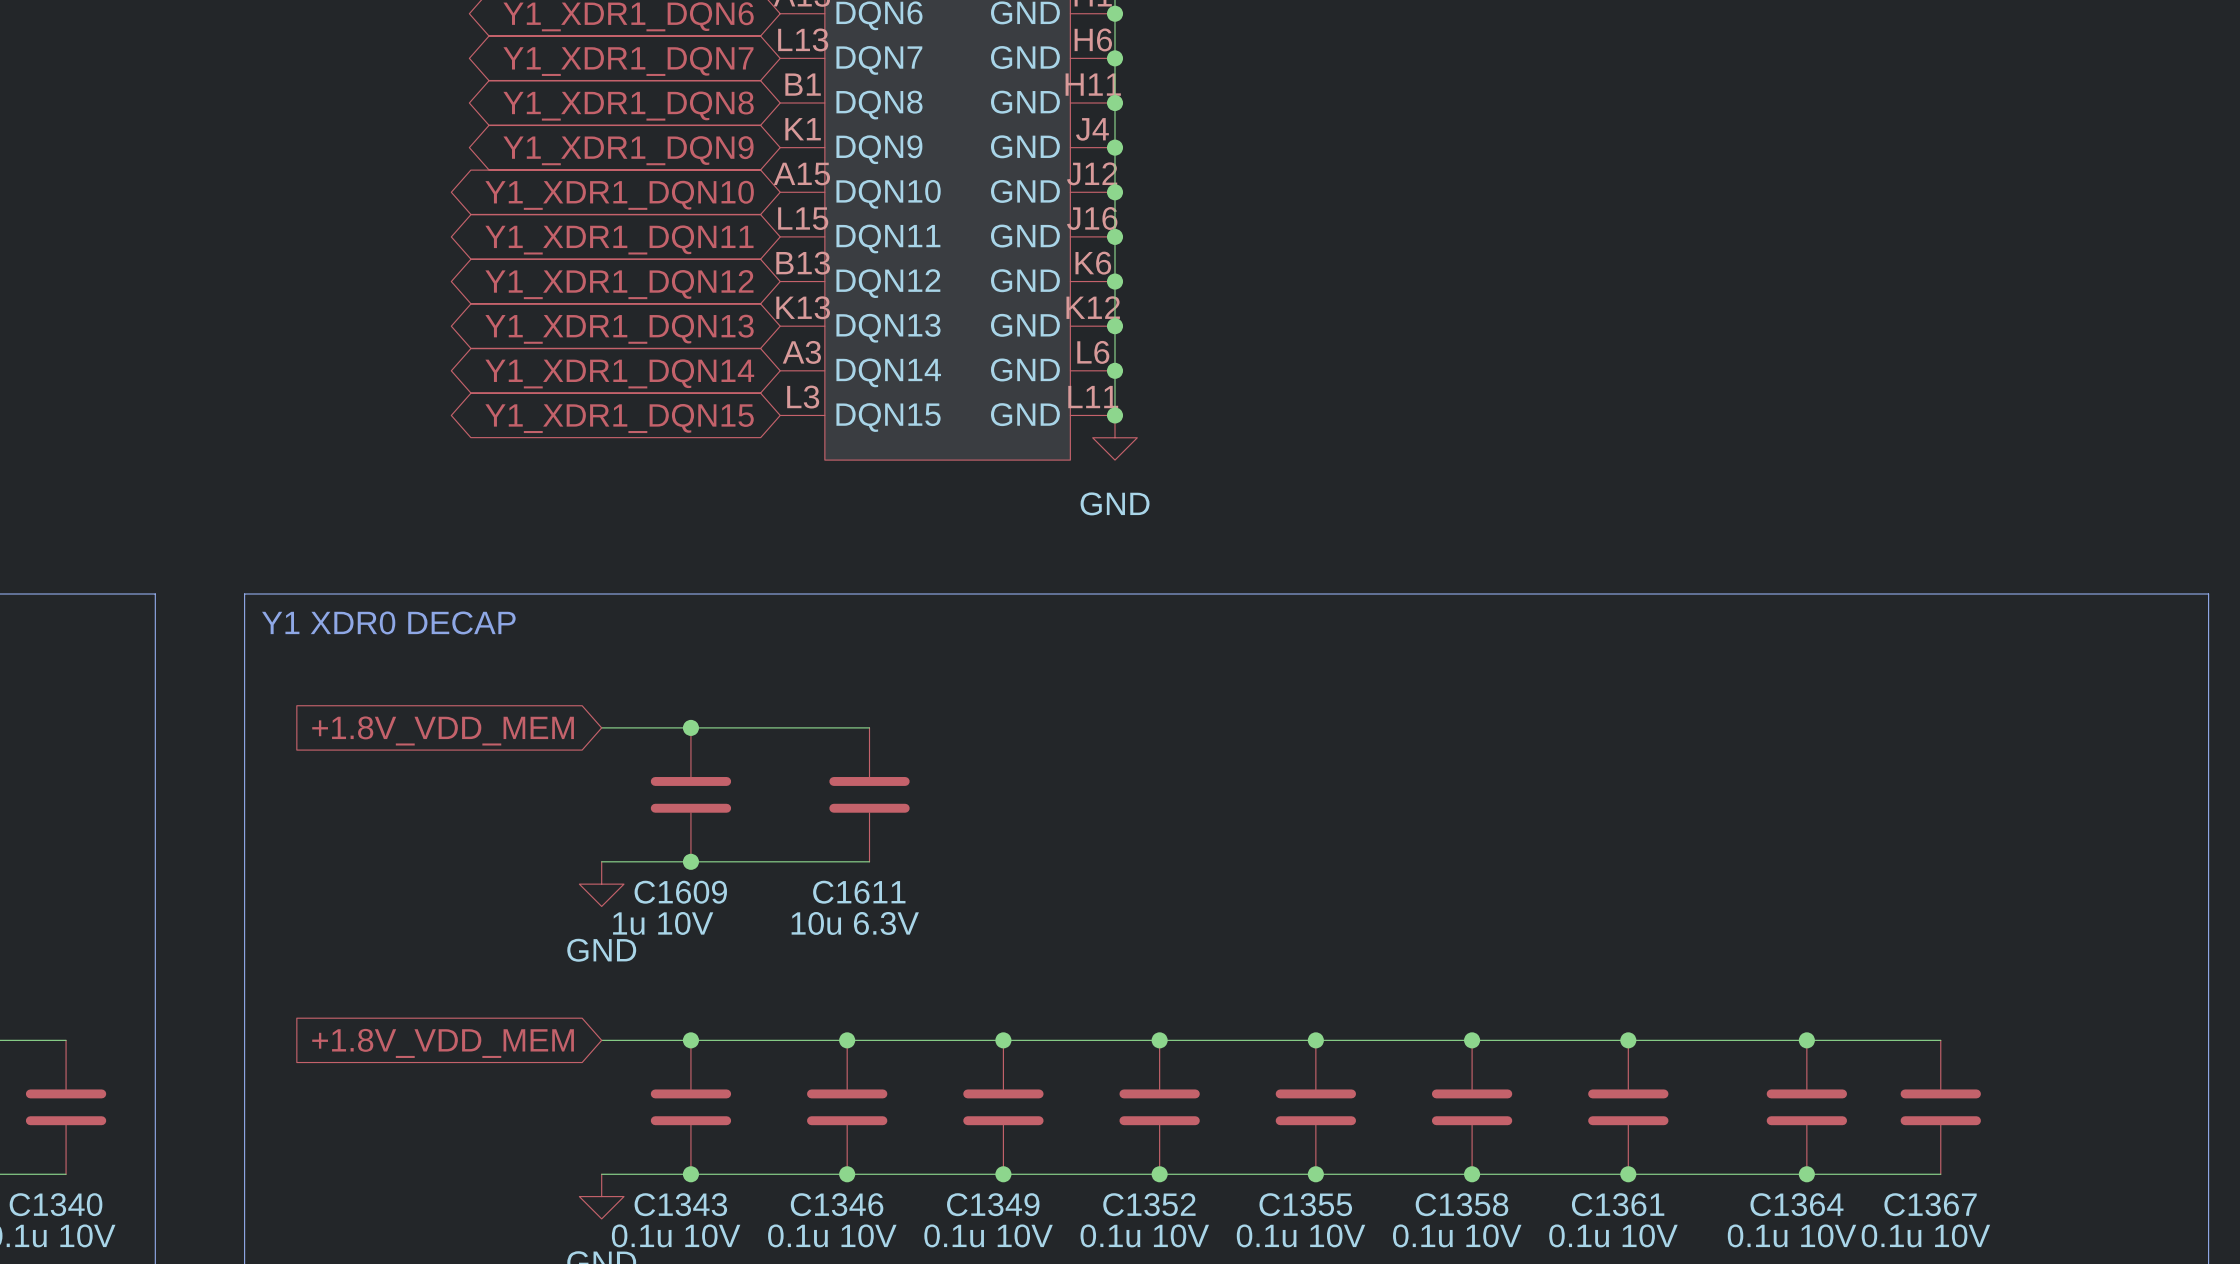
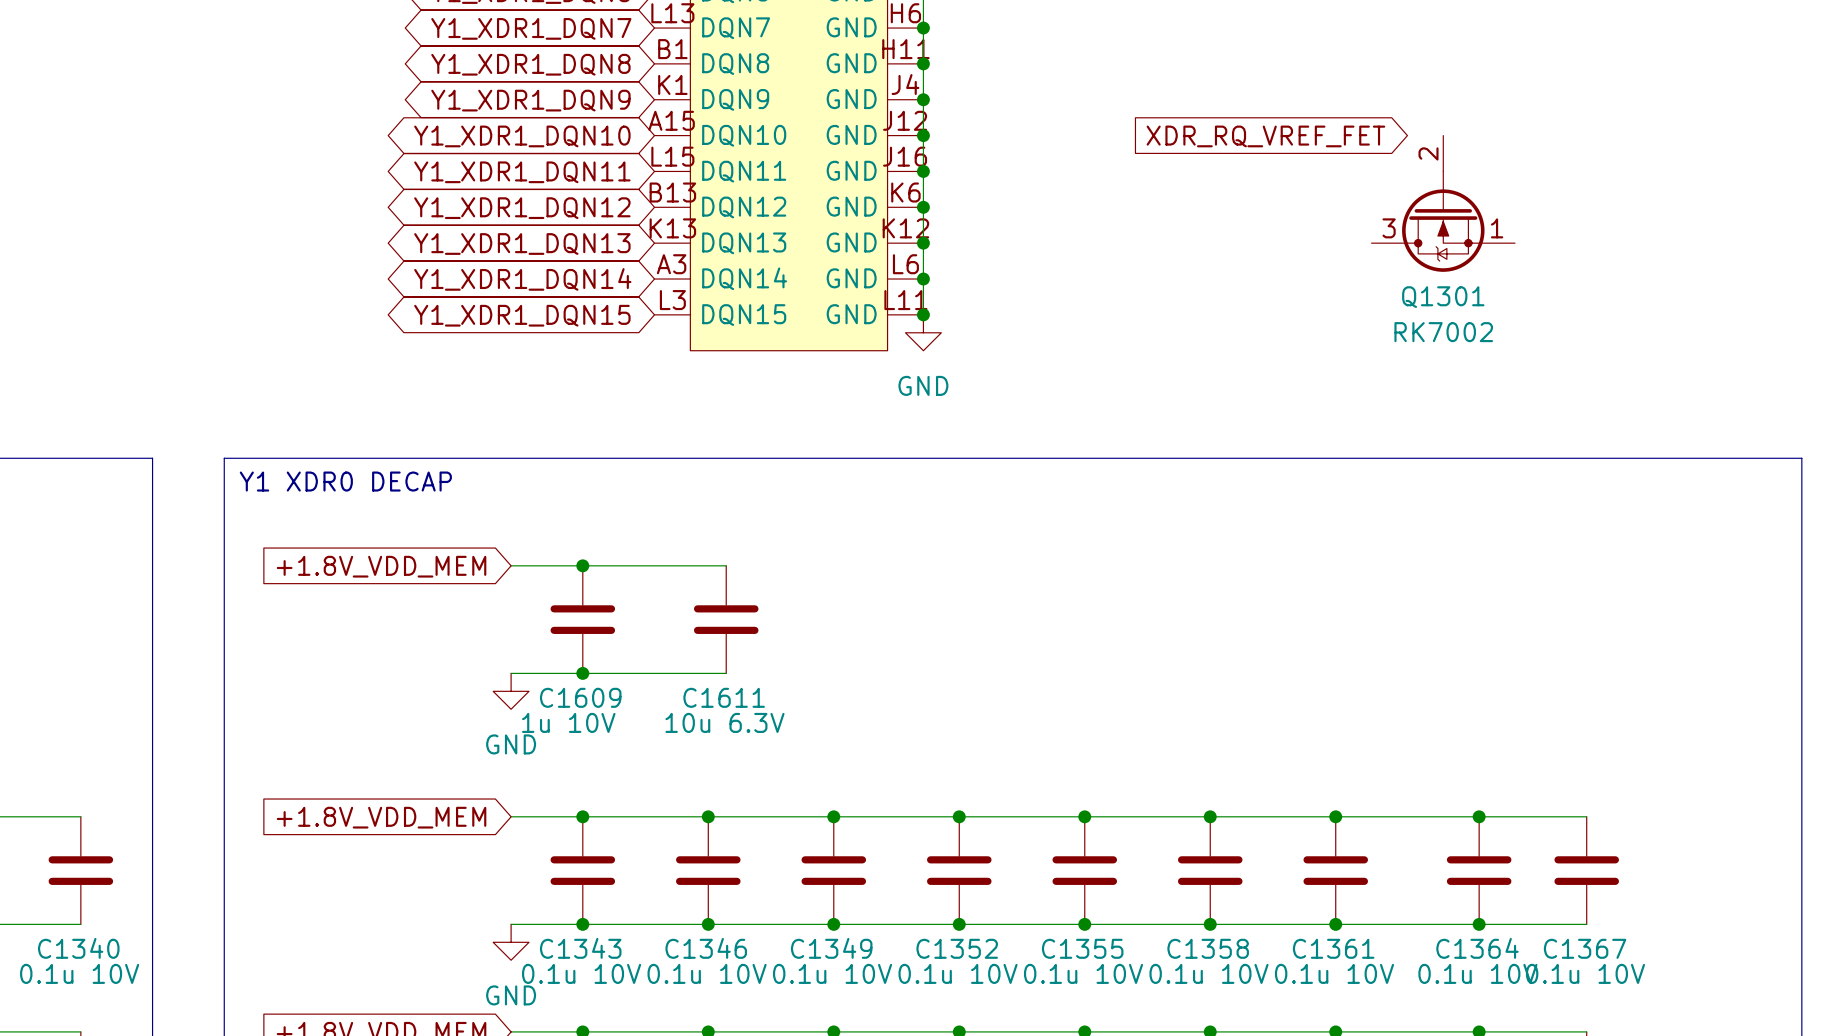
global label: none -> XDR_RQ_VREF_FET (1265, 136)
Q1301: none -> RK7002 (1443, 203)

